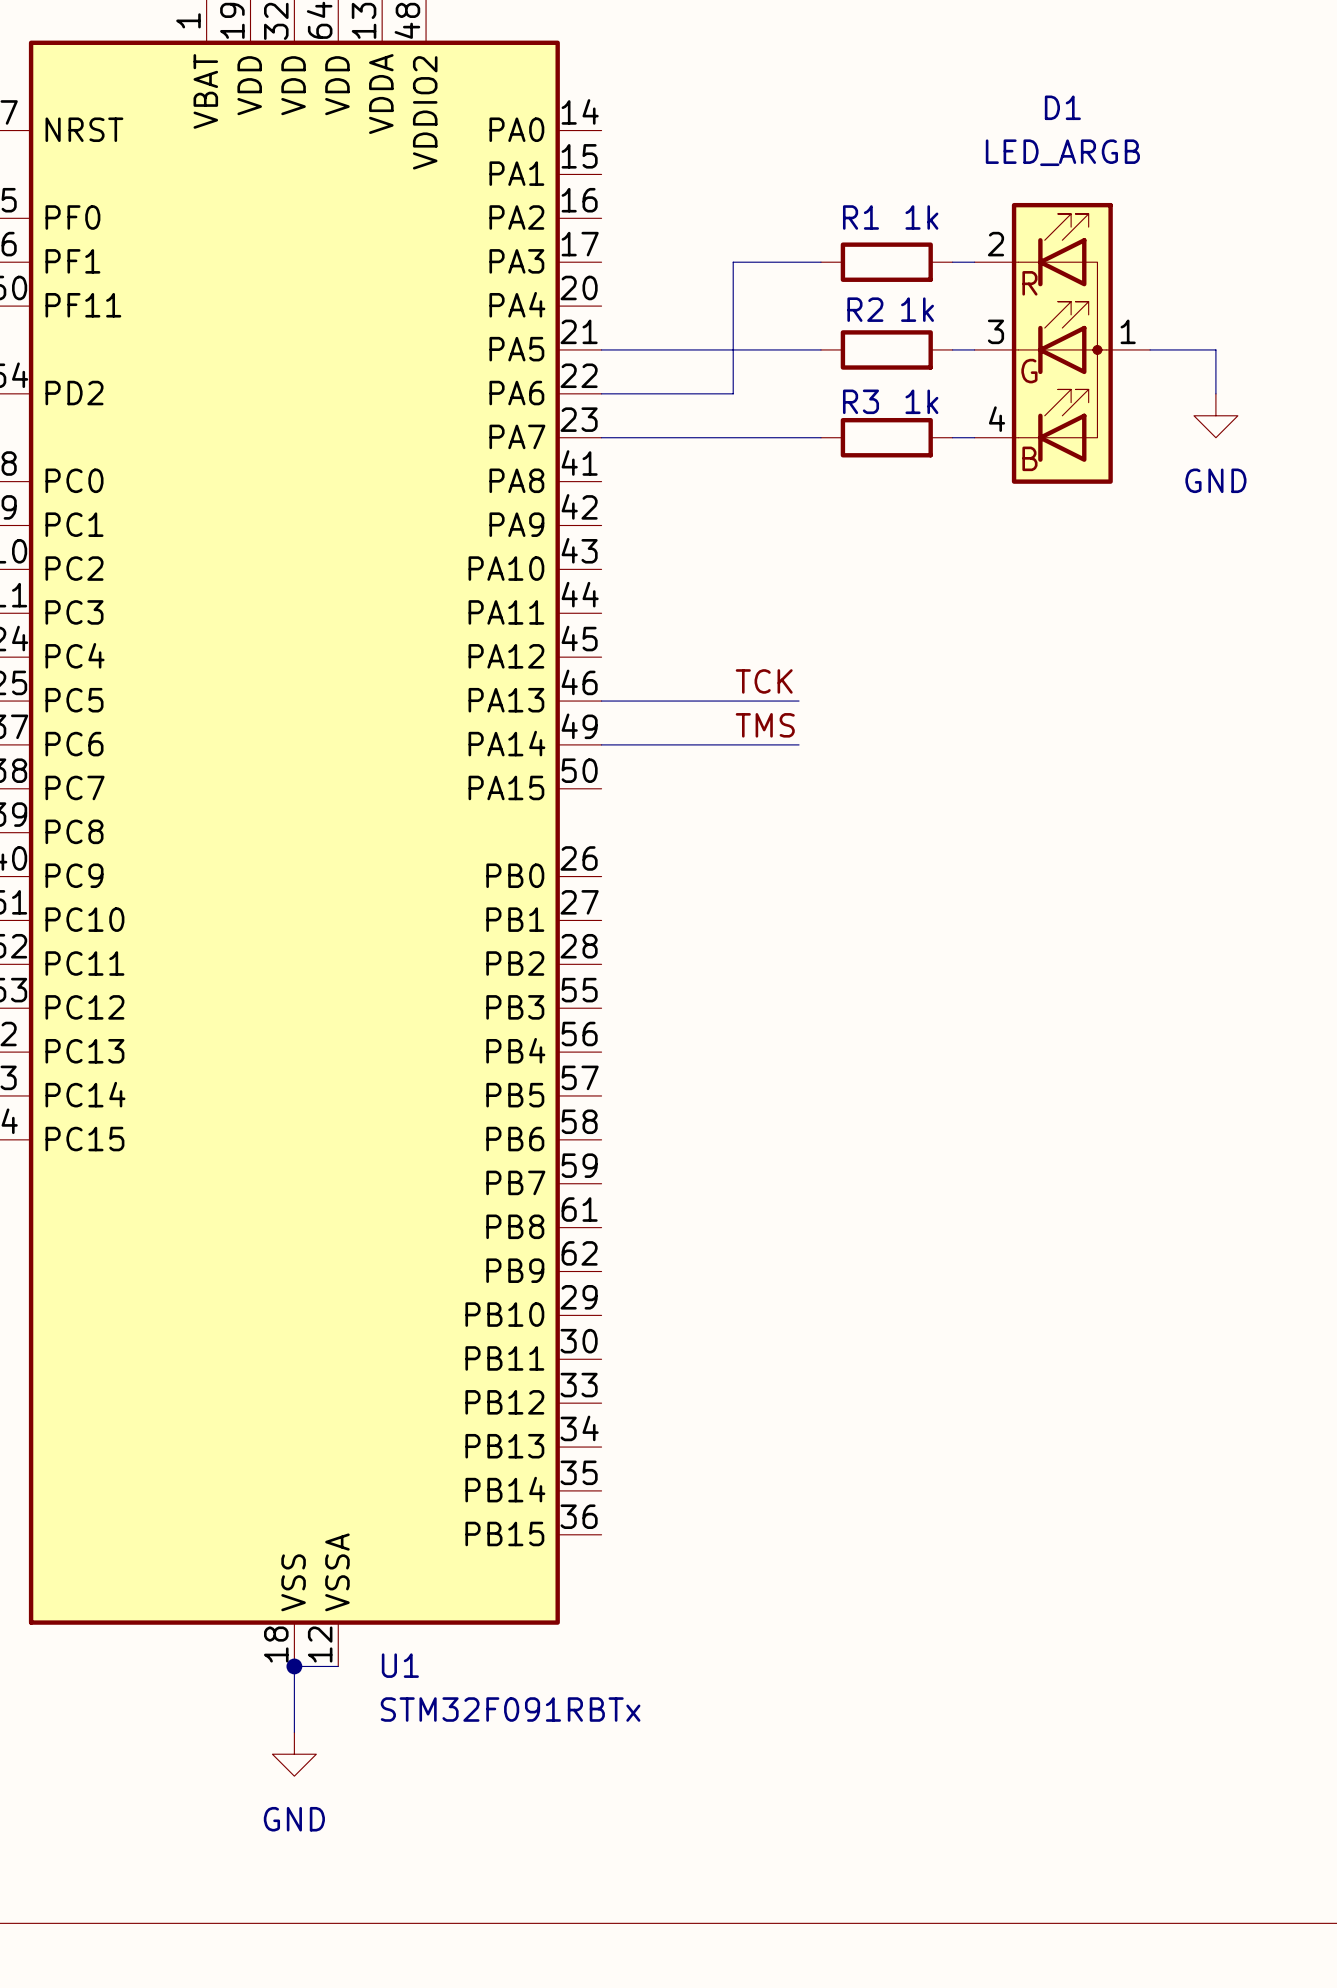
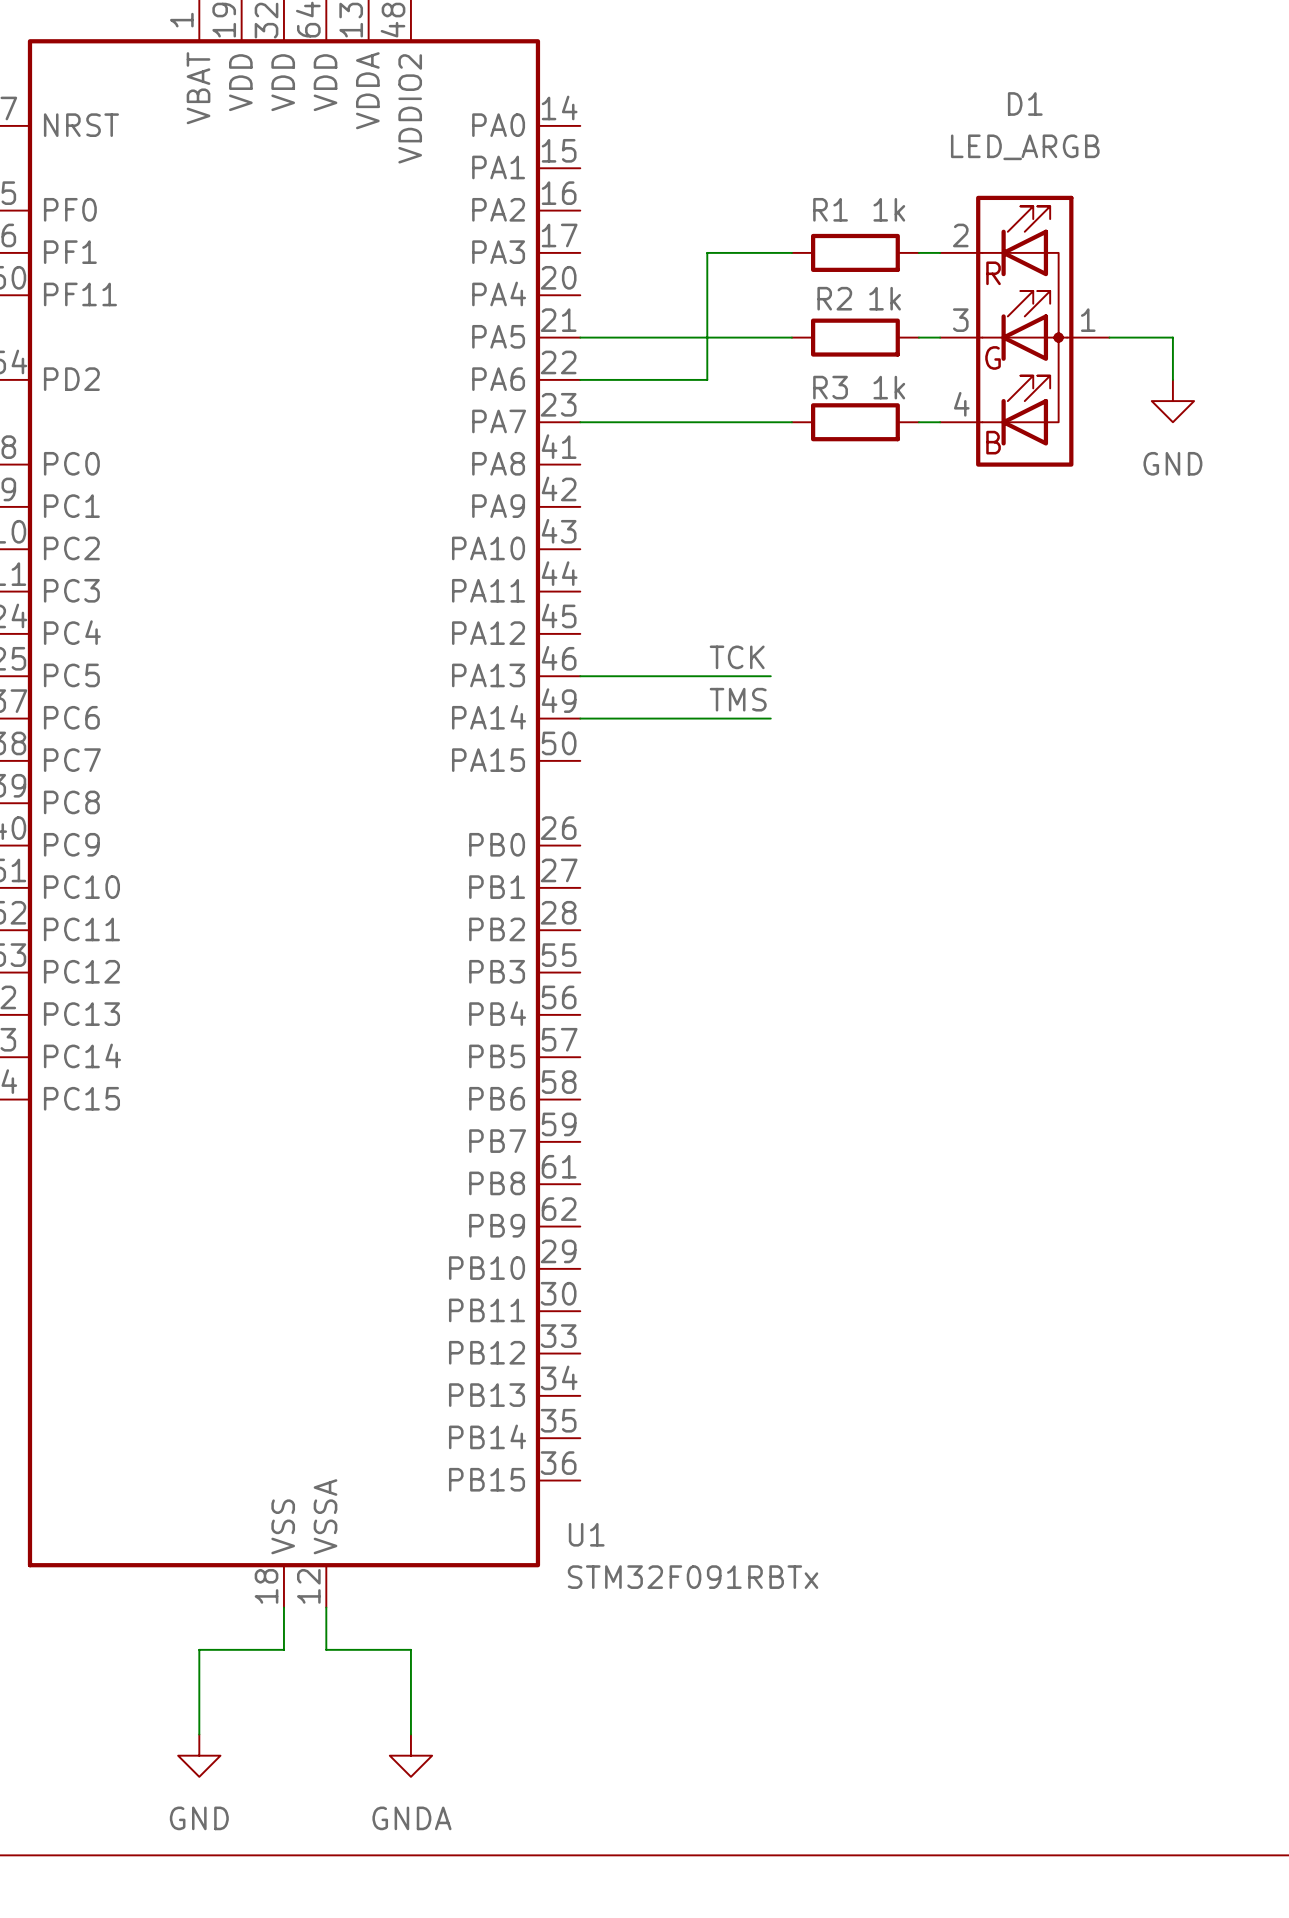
U1 name position: U1 (400, 1665) -> U1 (586, 1534)
wire: (294, 1666) (338, 1666) -> (410, 1734) (410, 1649) (326, 1649) (326, 1607)
junction: (294, 1666) -> none
U1 value position: STM32F091RBTx (510, 1709) -> STM32F091RBTx (693, 1577)
wire: (294, 1710) (294, 1732) -> (283, 1649) (199, 1649) (199, 1734)
power symbol position: GND (294, 1754) -> GND (199, 1755)
power symbol: none -> GNDA (410, 1755)

